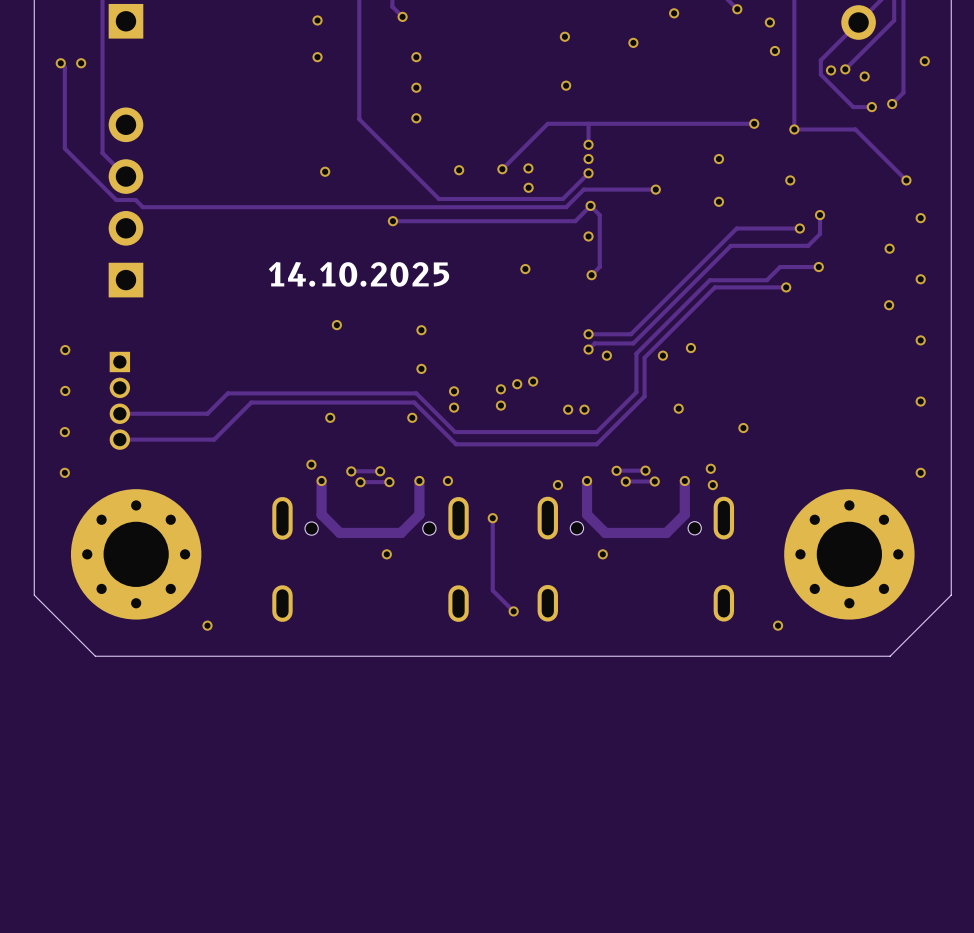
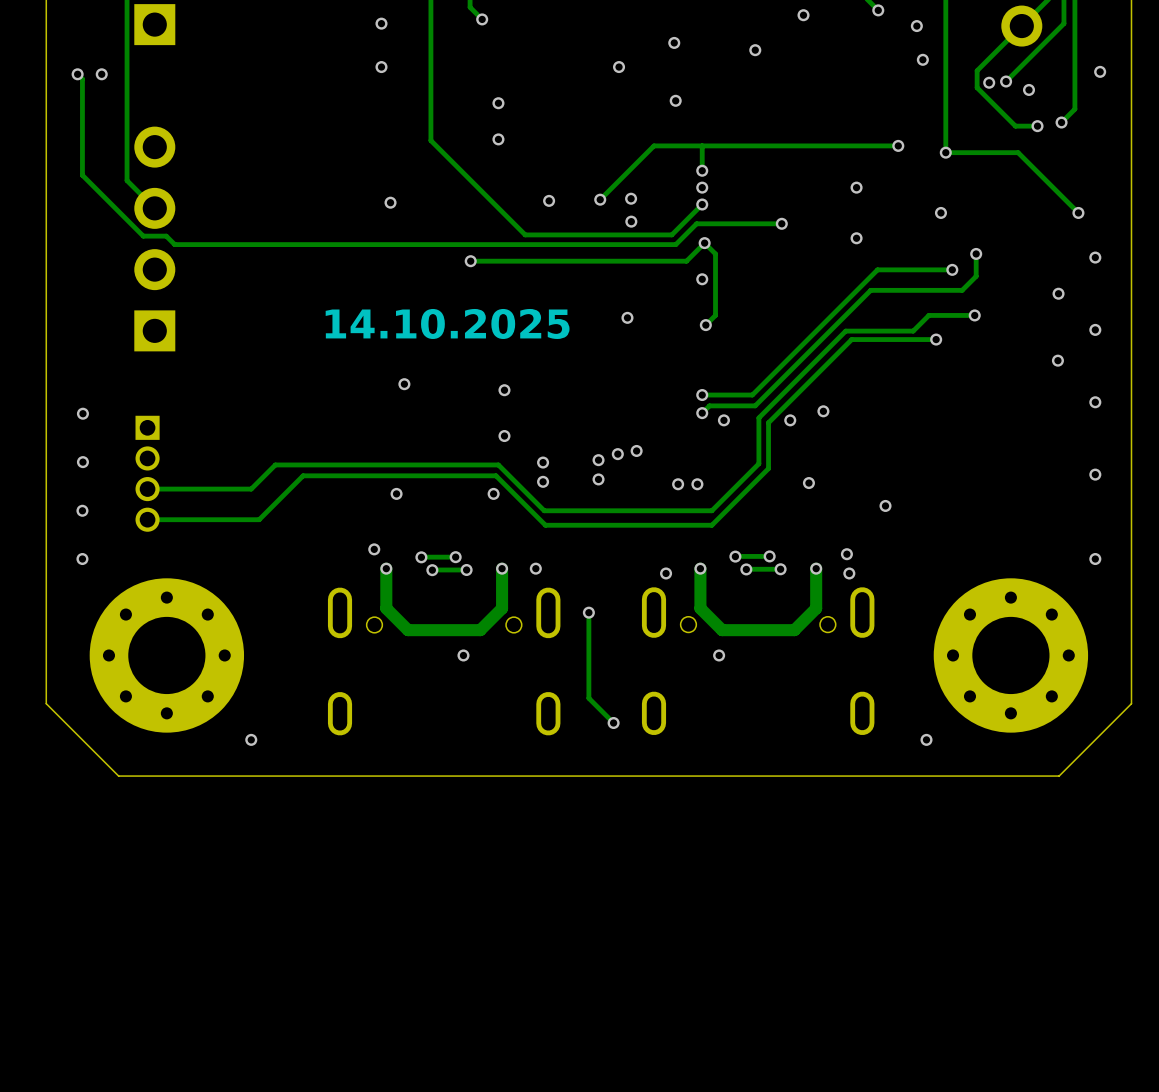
via position: (416, 57) -> (619, 67)

